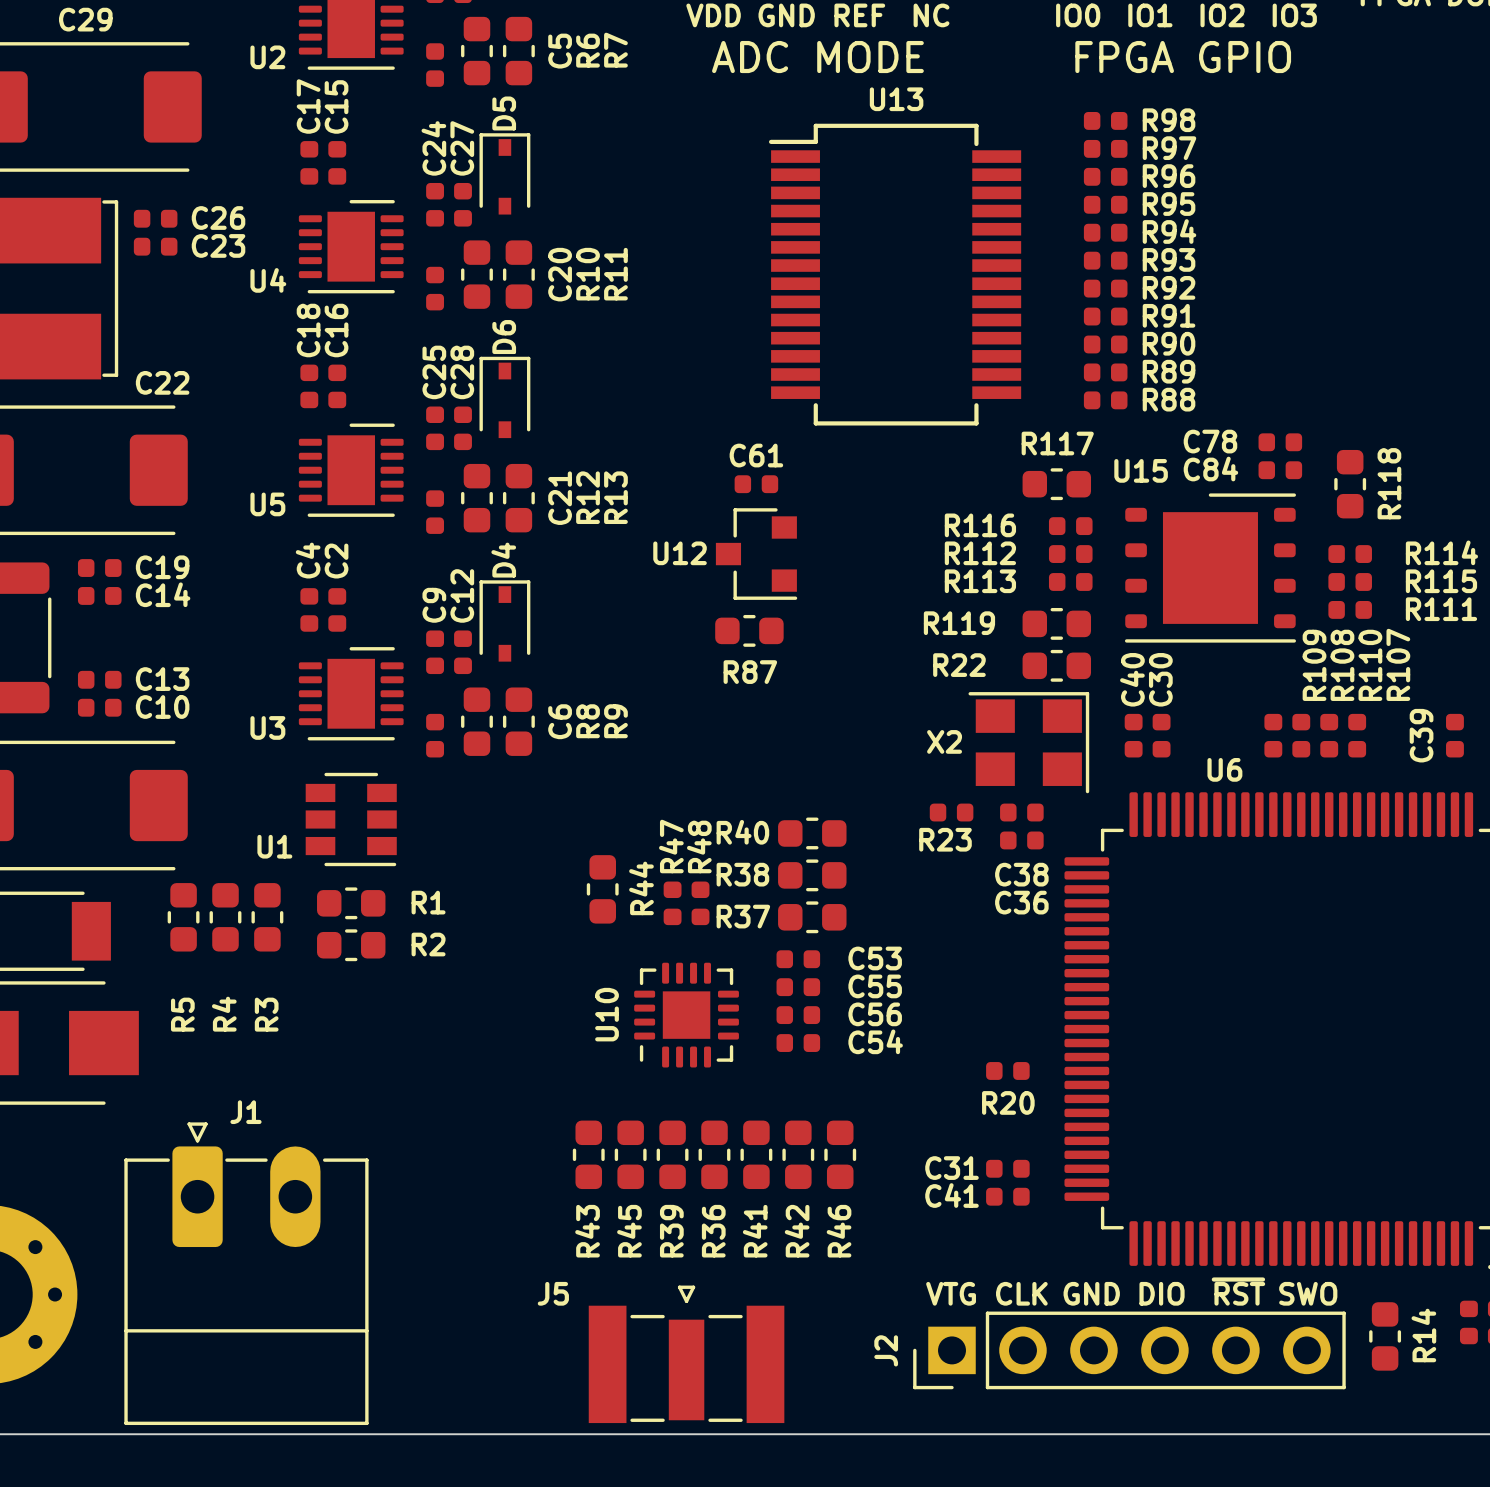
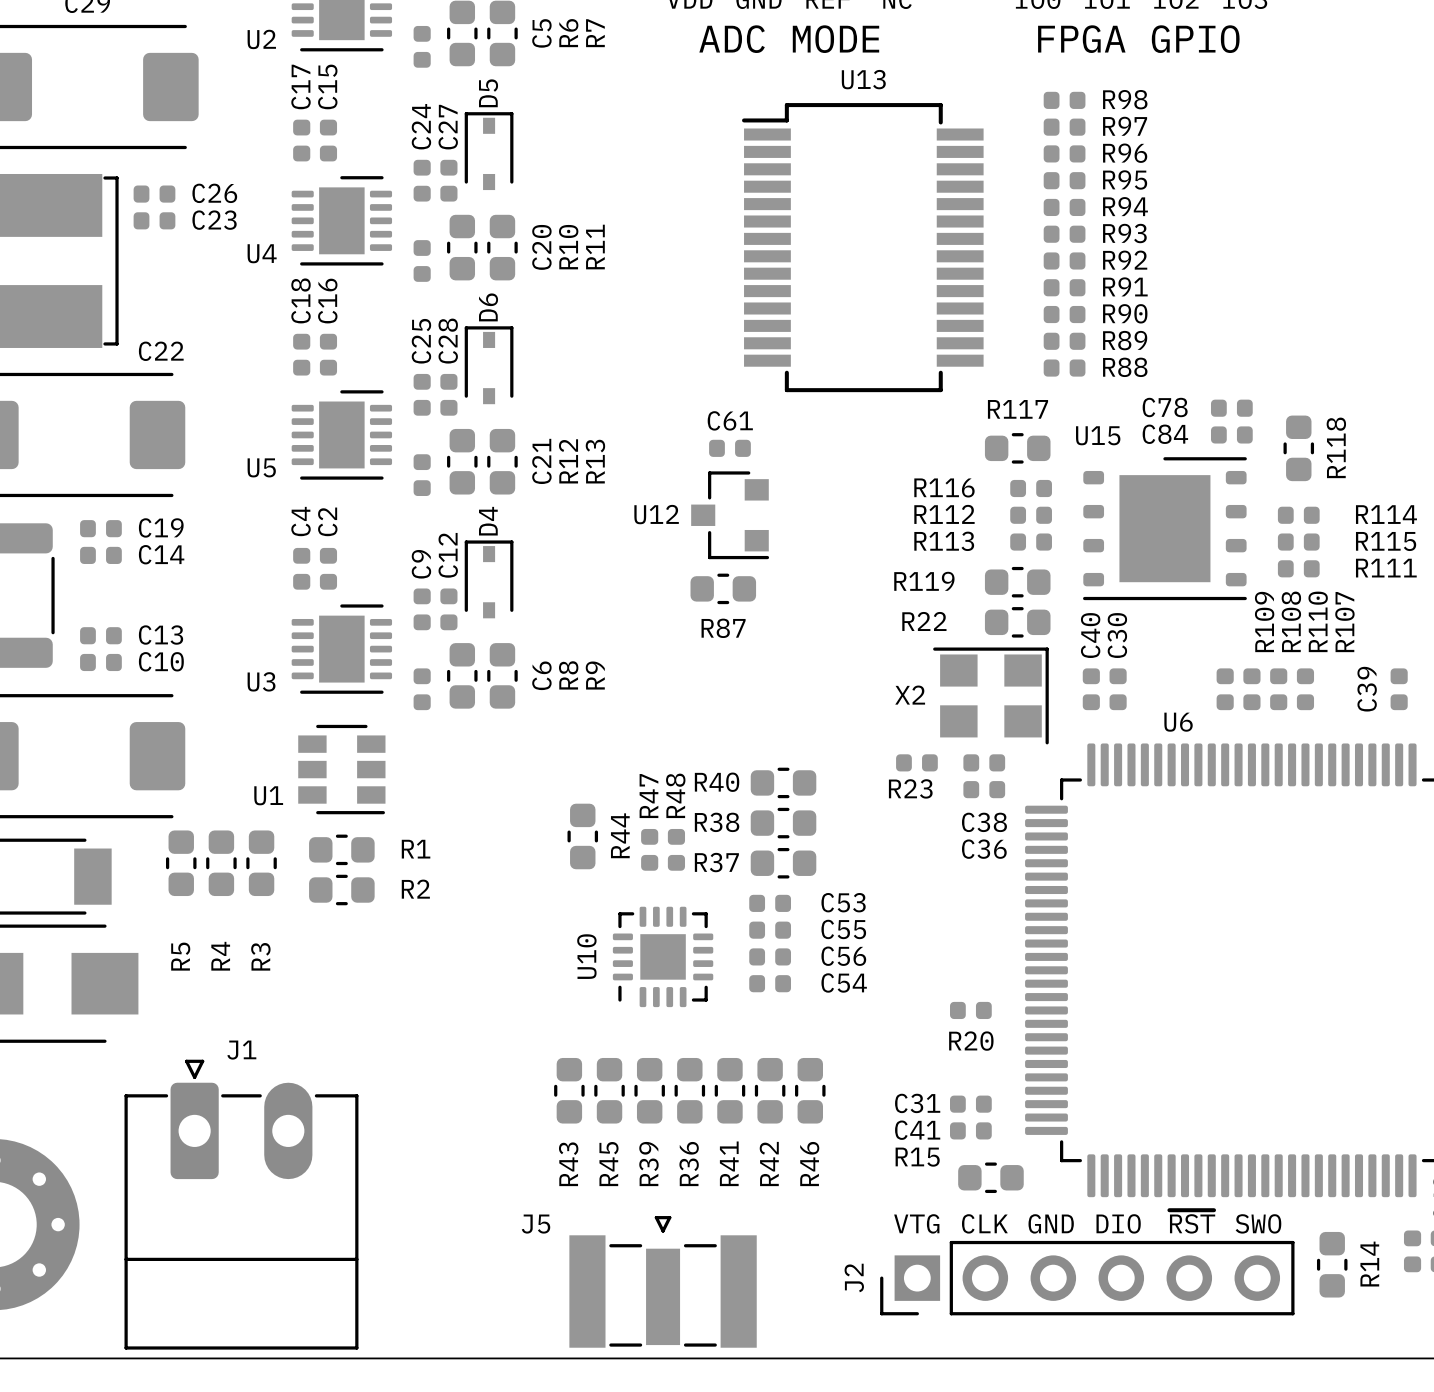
R15: none -> (990, 1177)

